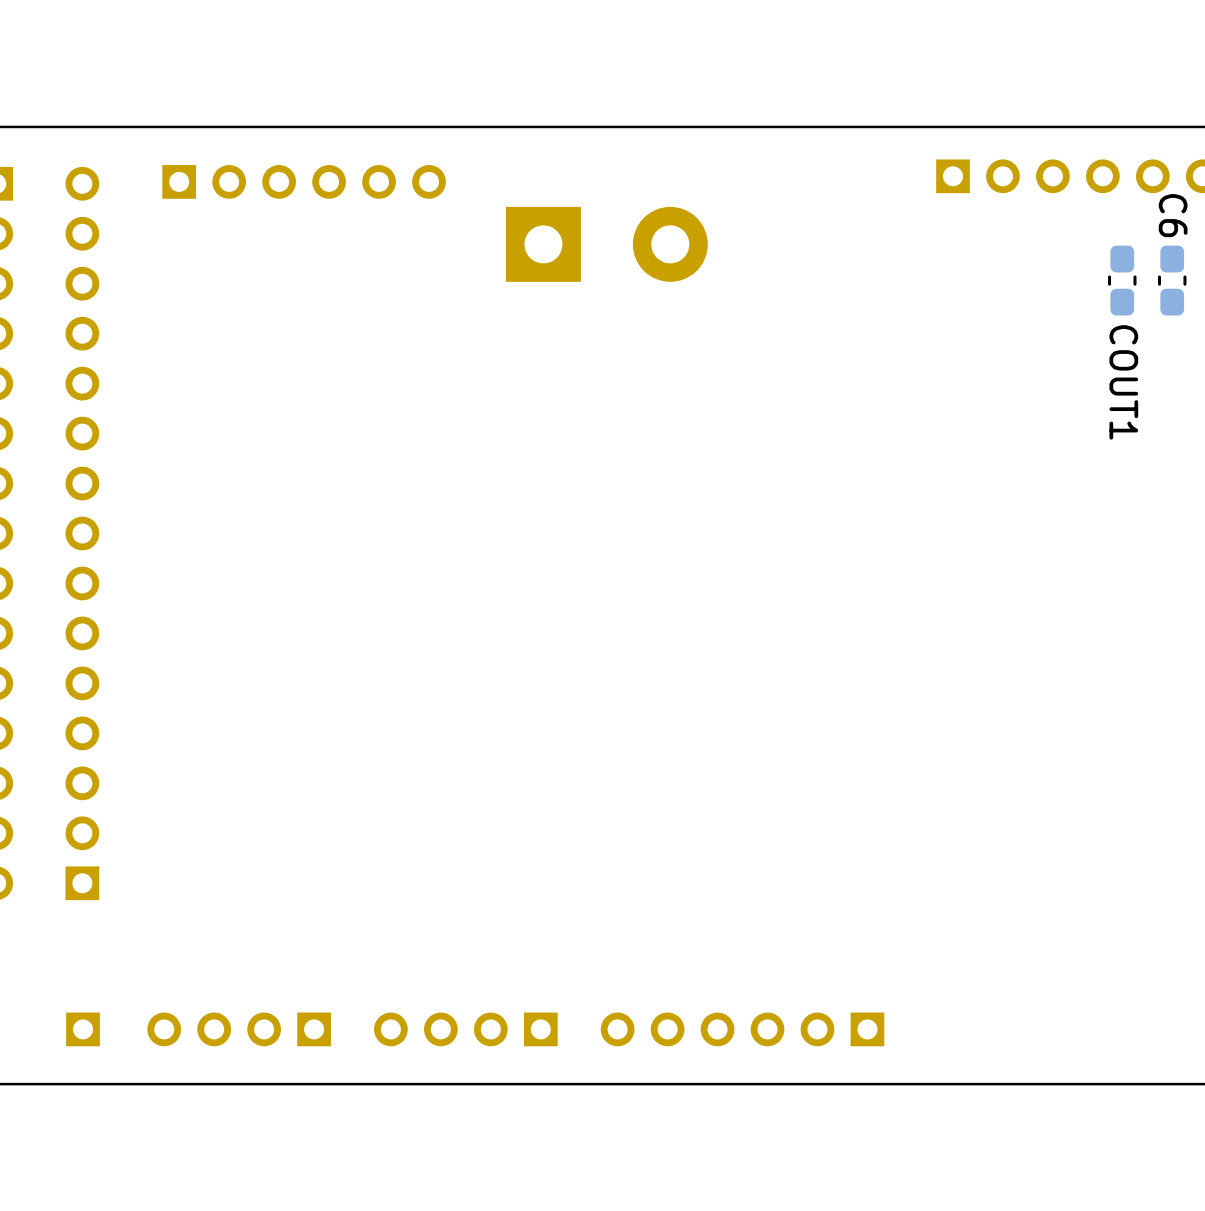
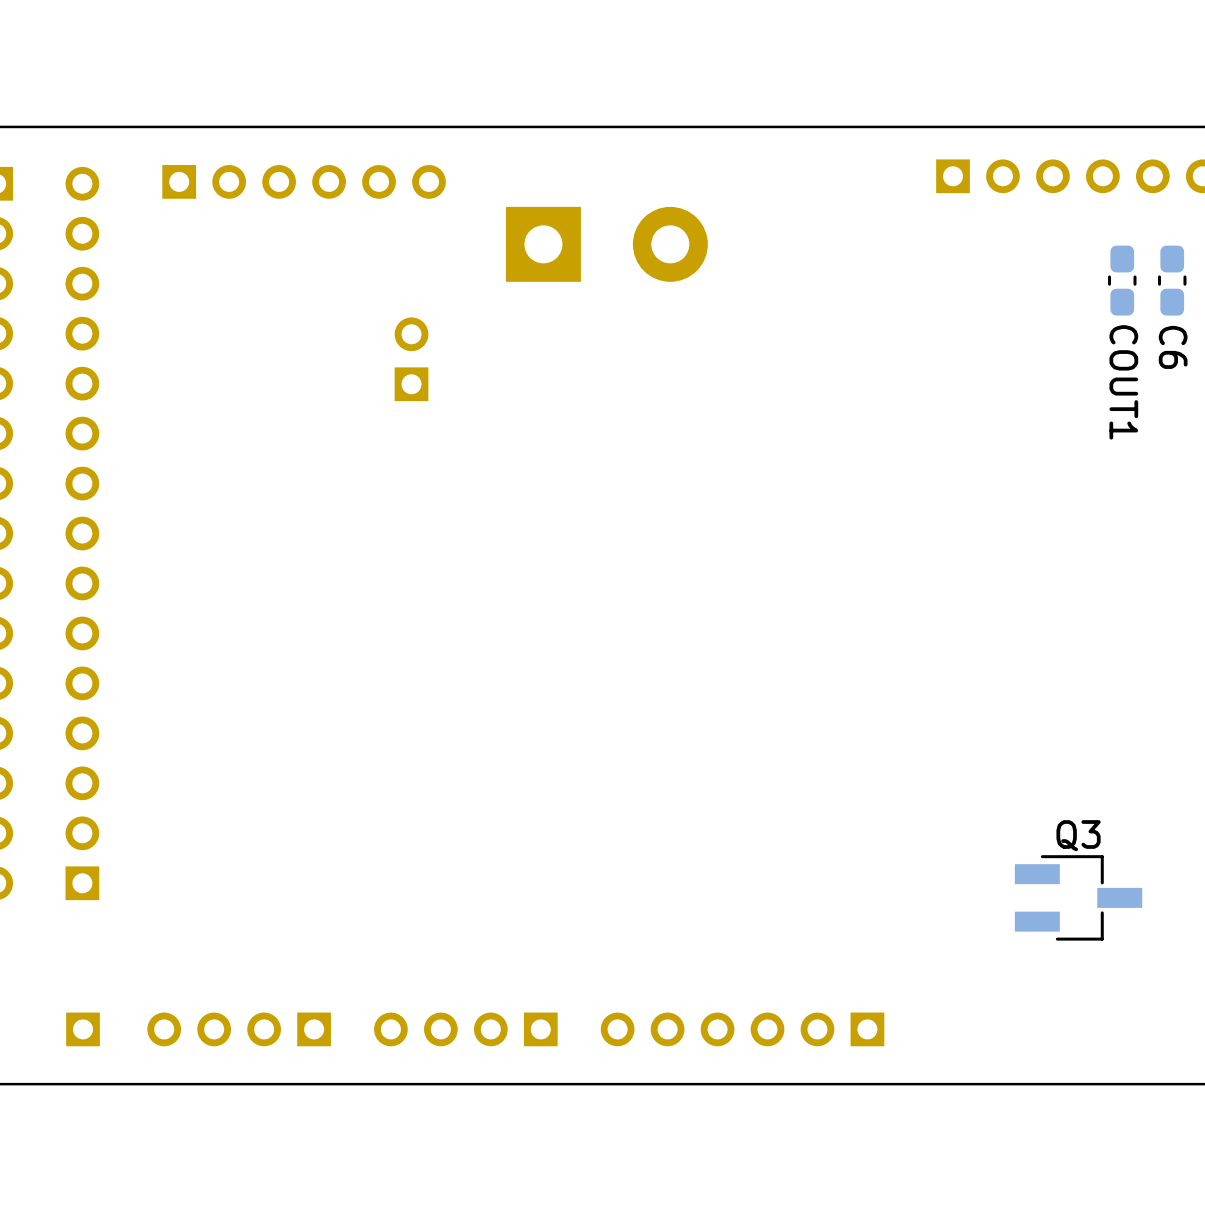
C6 name position: C6 (1173, 215) -> C6 (1173, 347)
part: none -> (411, 359)
Q3: none -> (1078, 897)

